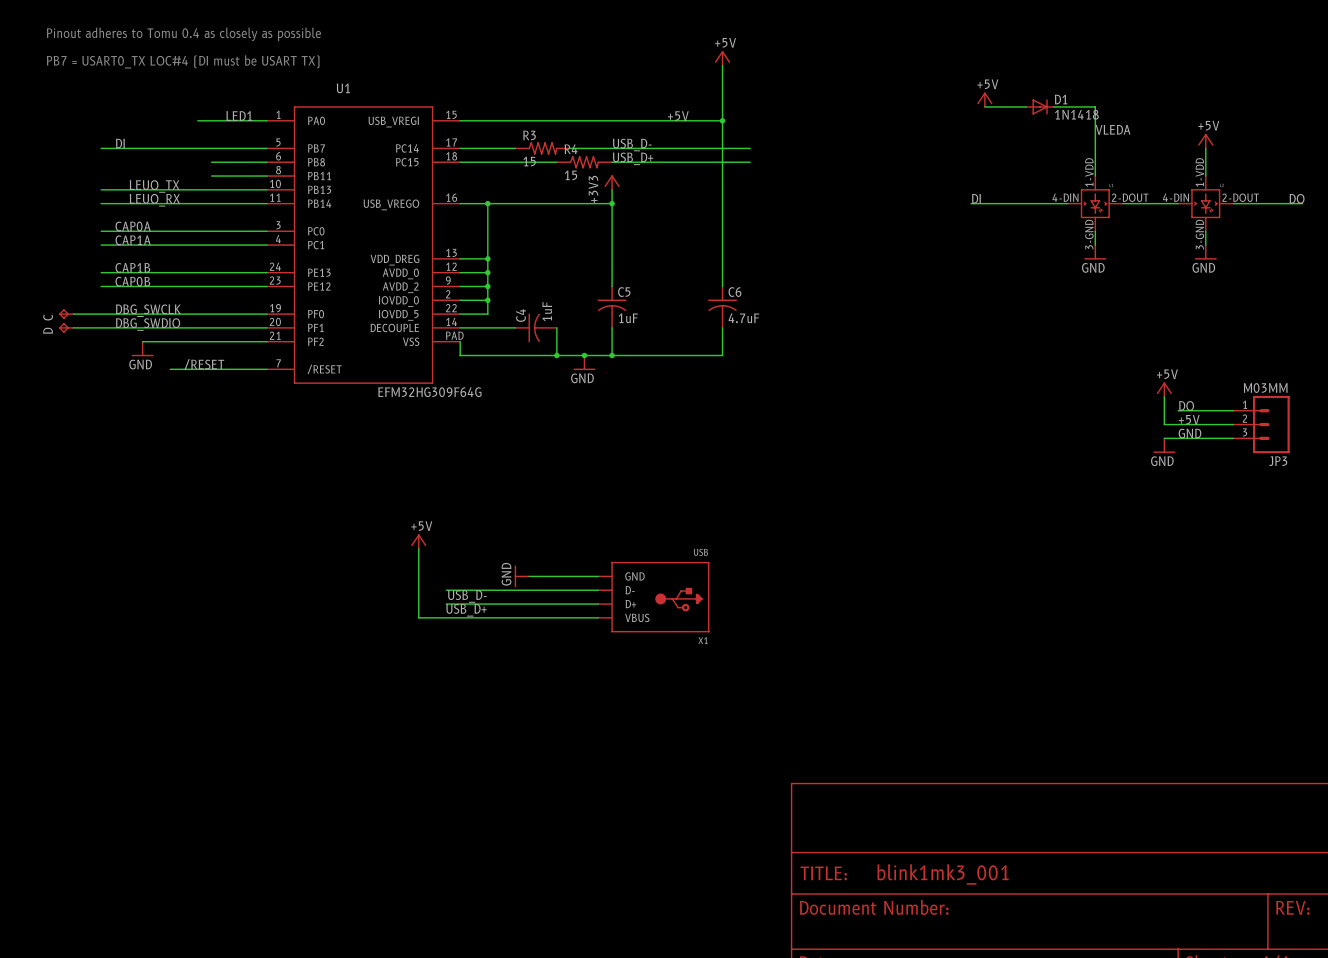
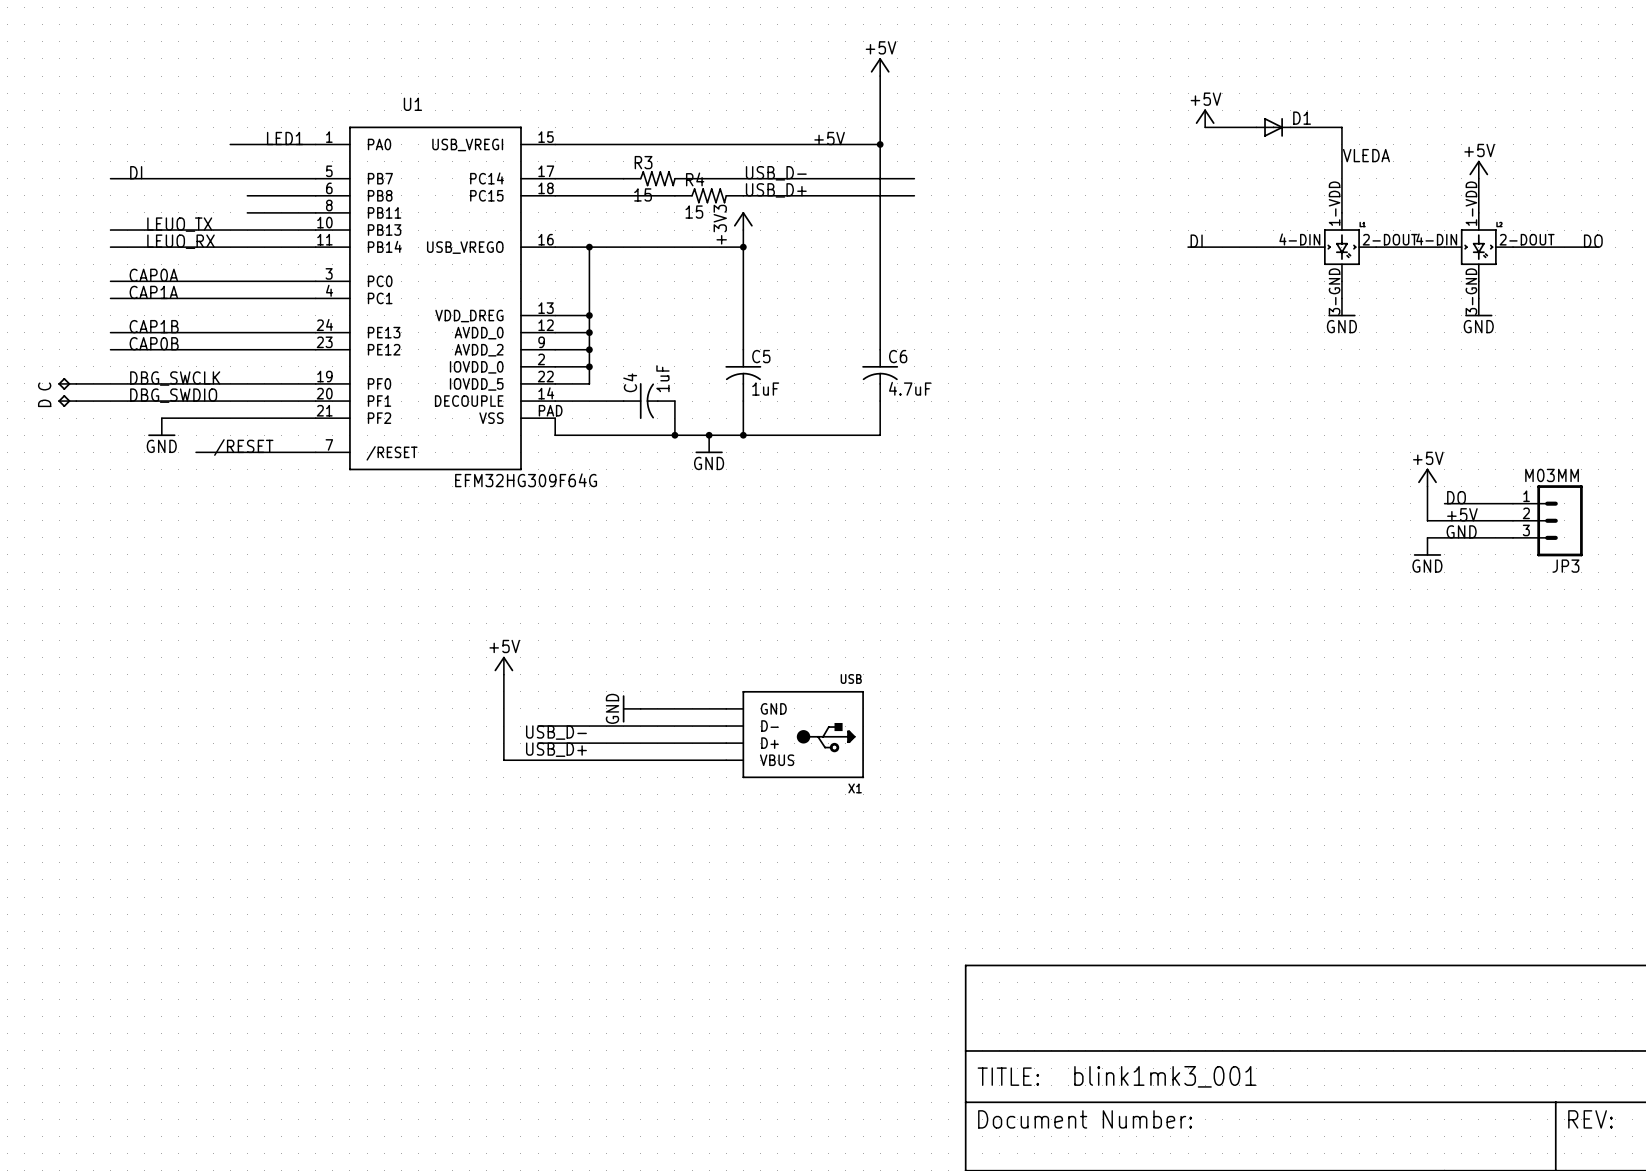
text: Pinout adheres to Tomu 0.4 as closely as possible (183, 34) -> none
text: PB7 = USART0_TX LOC#4 (DI must be USART TX) (183, 61) -> none
D1 value: 1N1418 (1076, 114) -> none

